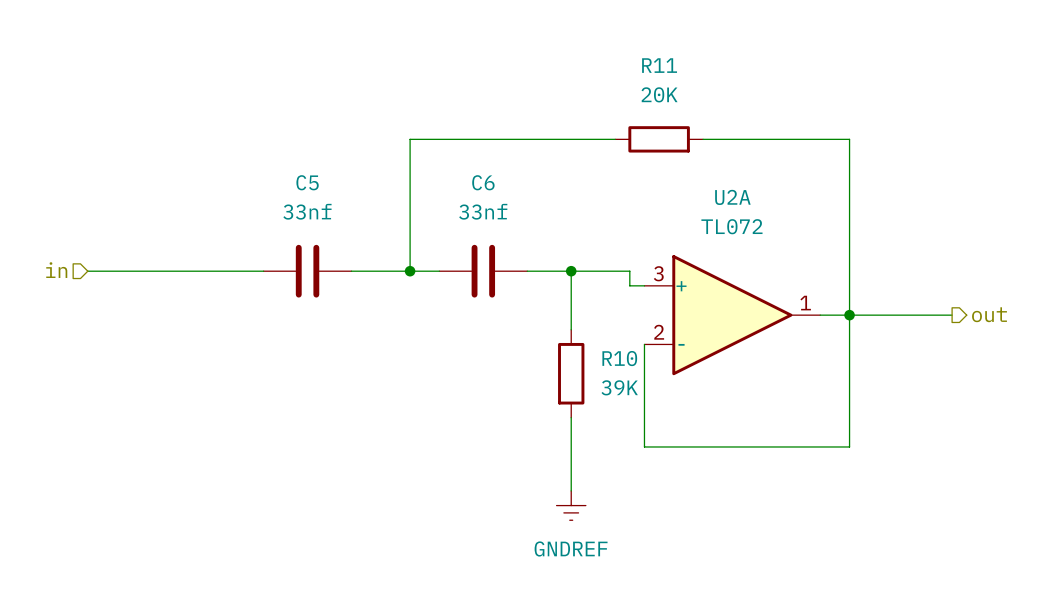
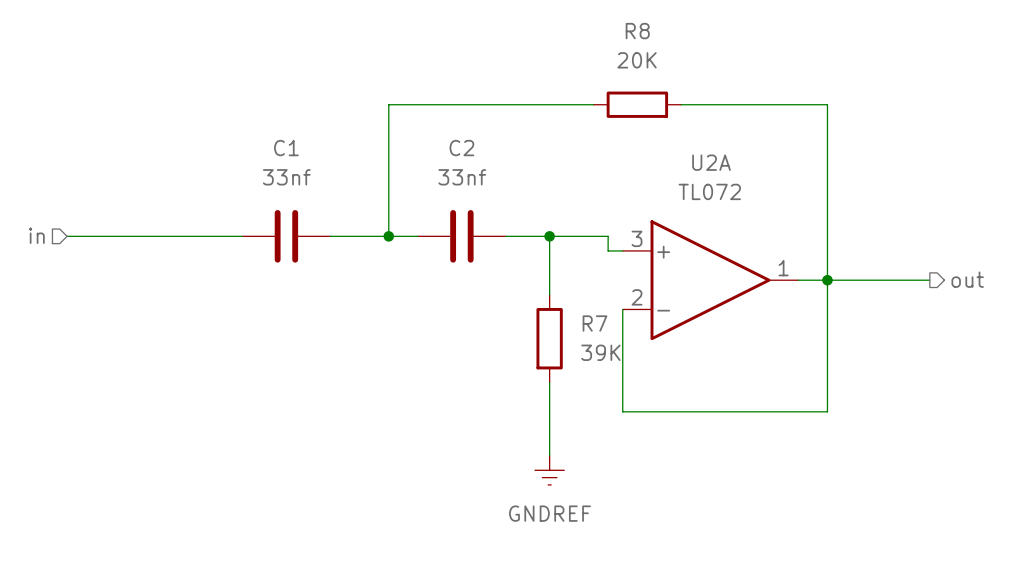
R11 name: R11 (659, 65) -> R8 (637, 31)
C5 name: C5 (307, 182) -> C1 (286, 148)
C6 name: C6 (483, 182) -> C2 (461, 148)
R10 name: R10 (619, 358) -> R7 (595, 323)

